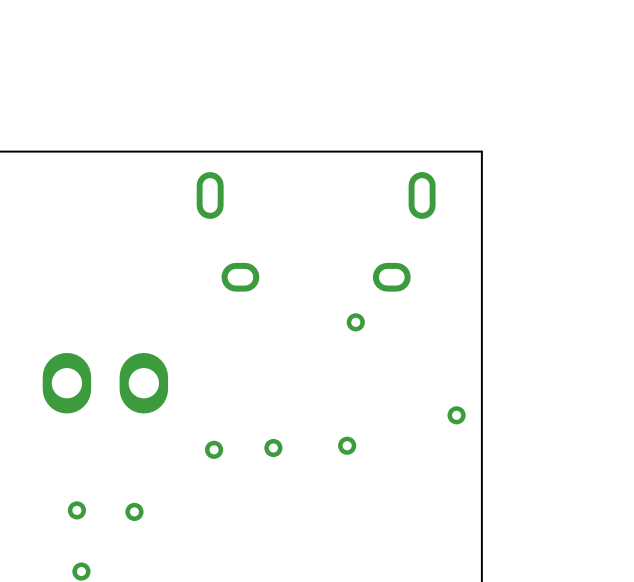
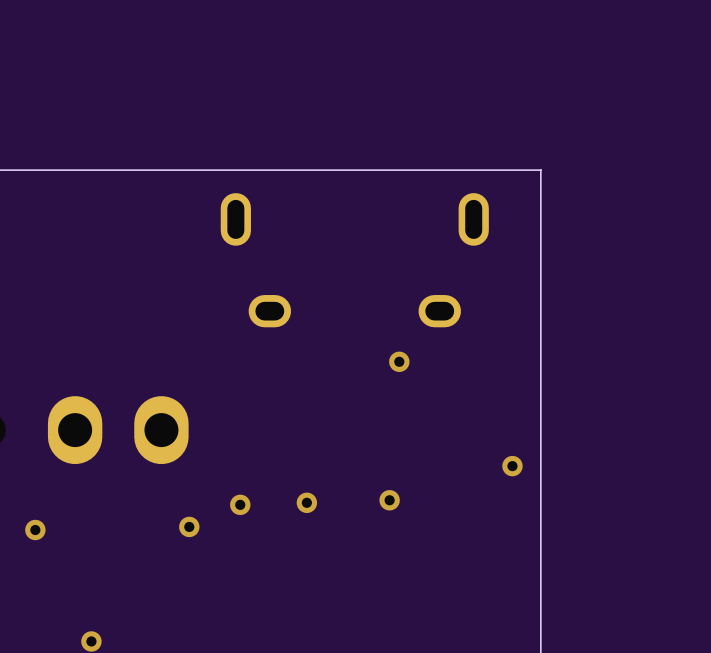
via: none -> (189, 526)
via: none -> (35, 530)
via: (76, 510) -> none
via: (134, 511) -> none

